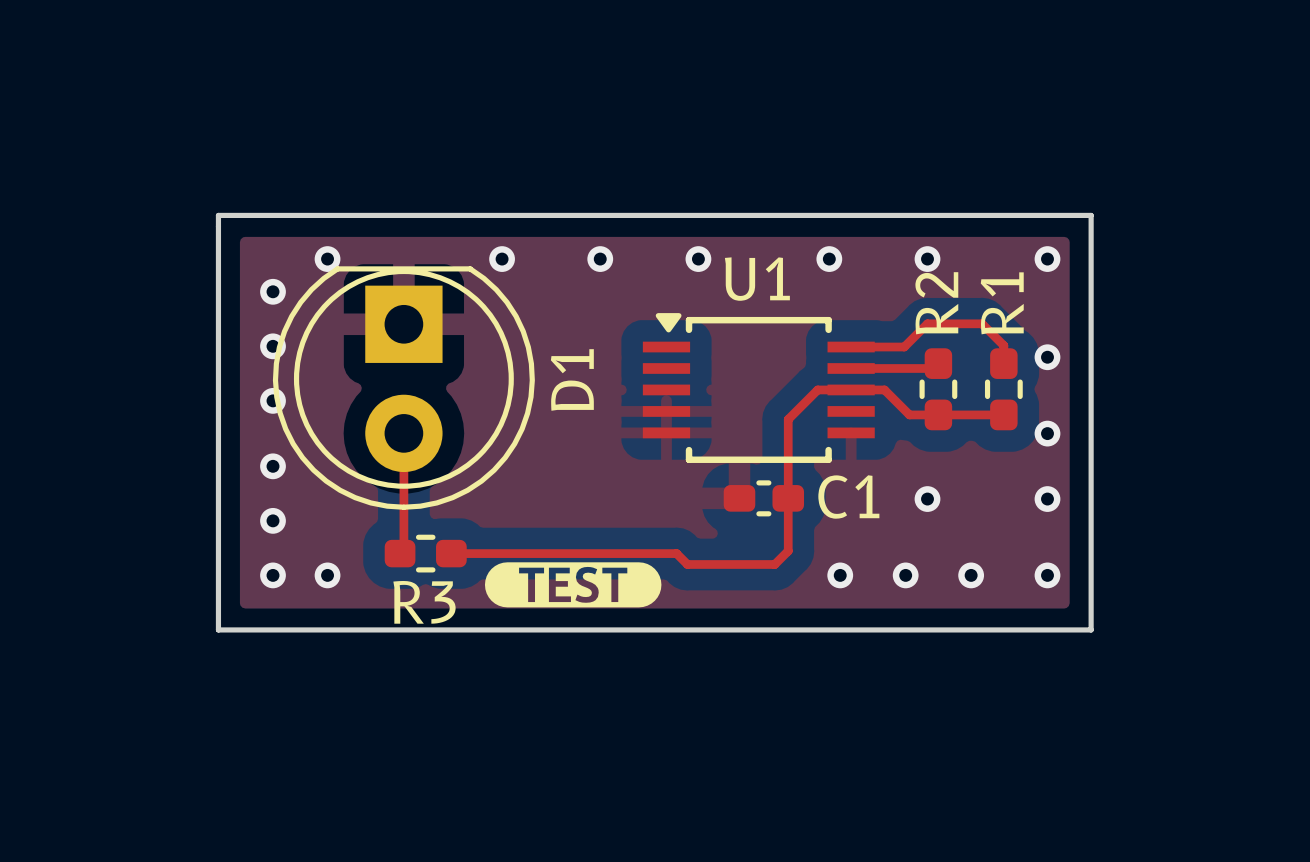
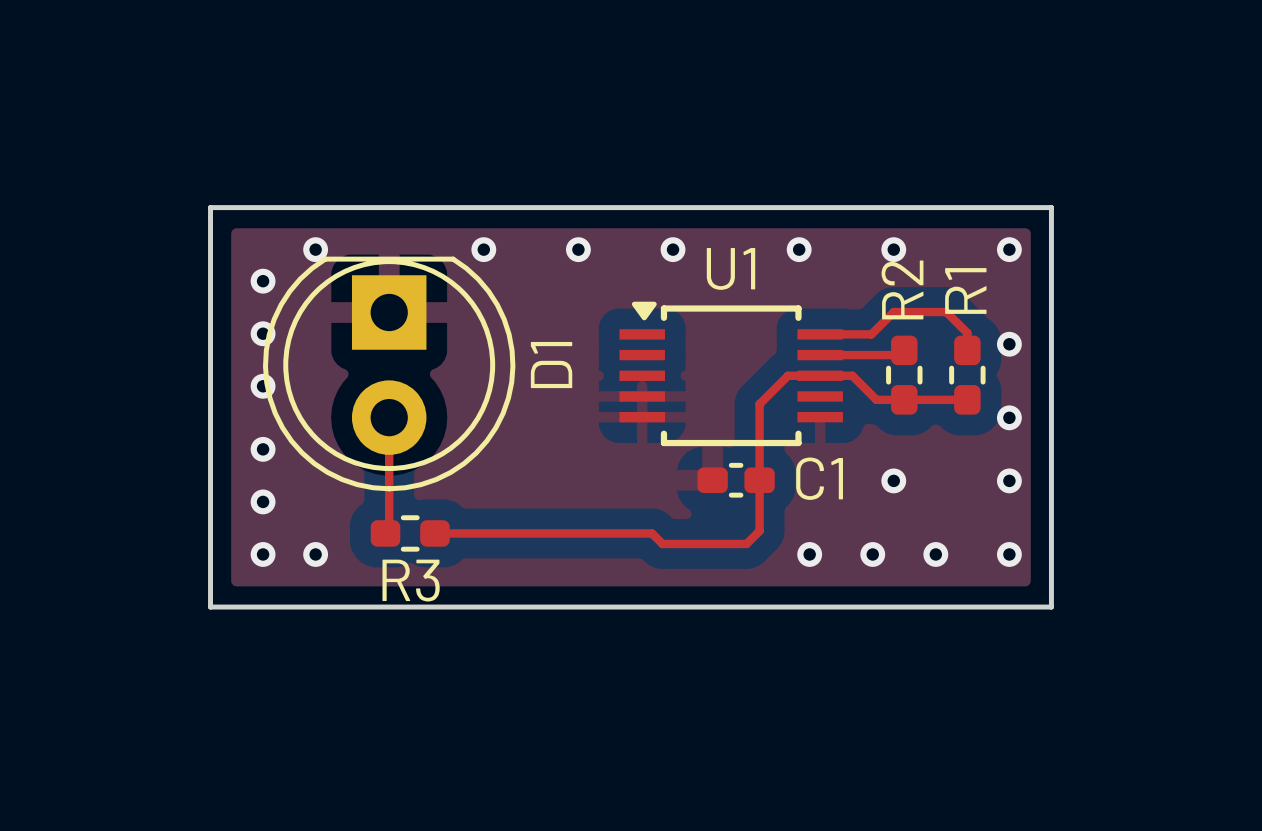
drawing: [484, 562, 662, 608] -> none

